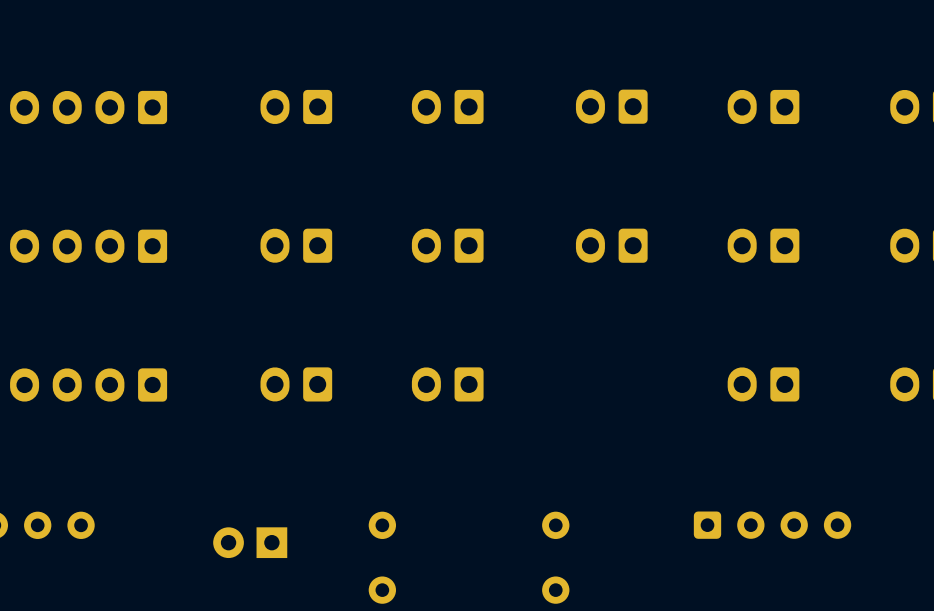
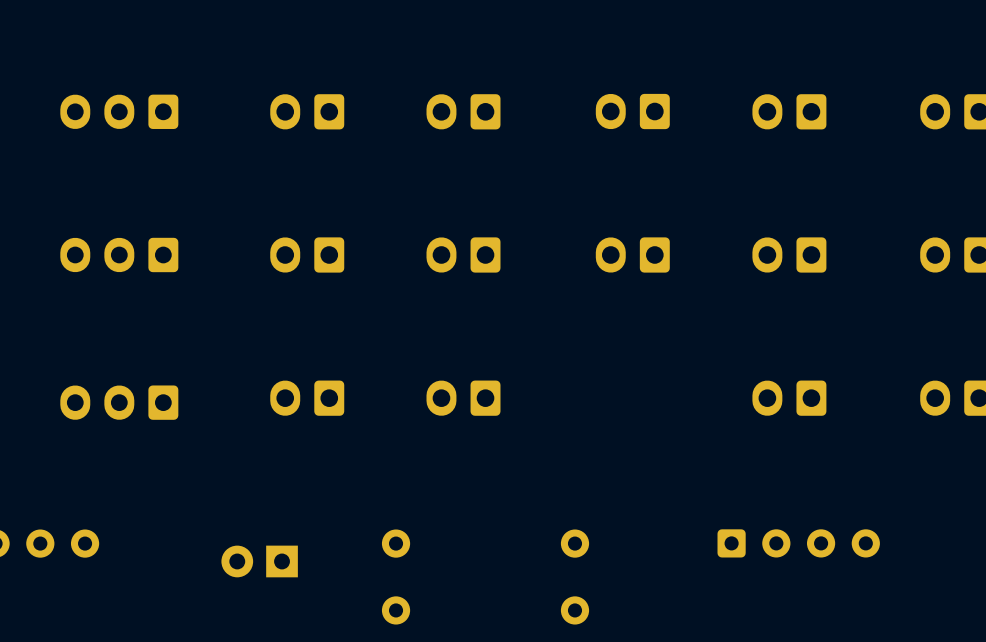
part: none -> (119, 111)
part: (88, 107) -> none
part: none -> (119, 254)
part: (88, 246) -> none
part: (88, 384) -> none
part: none -> (119, 402)

